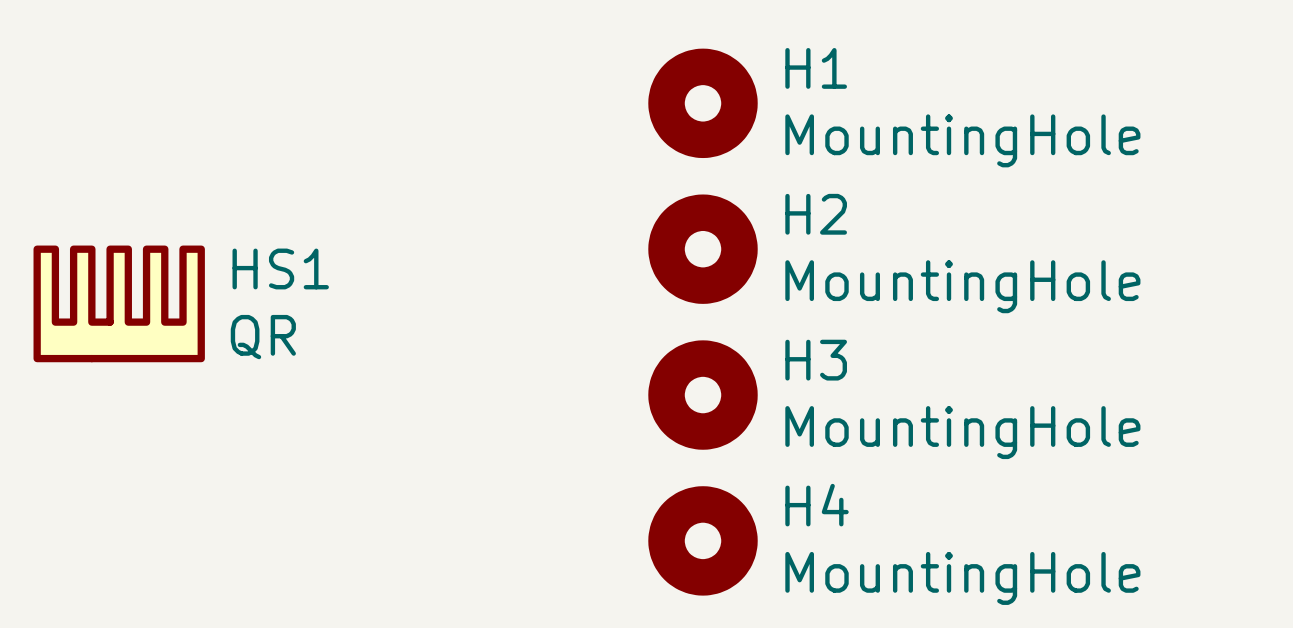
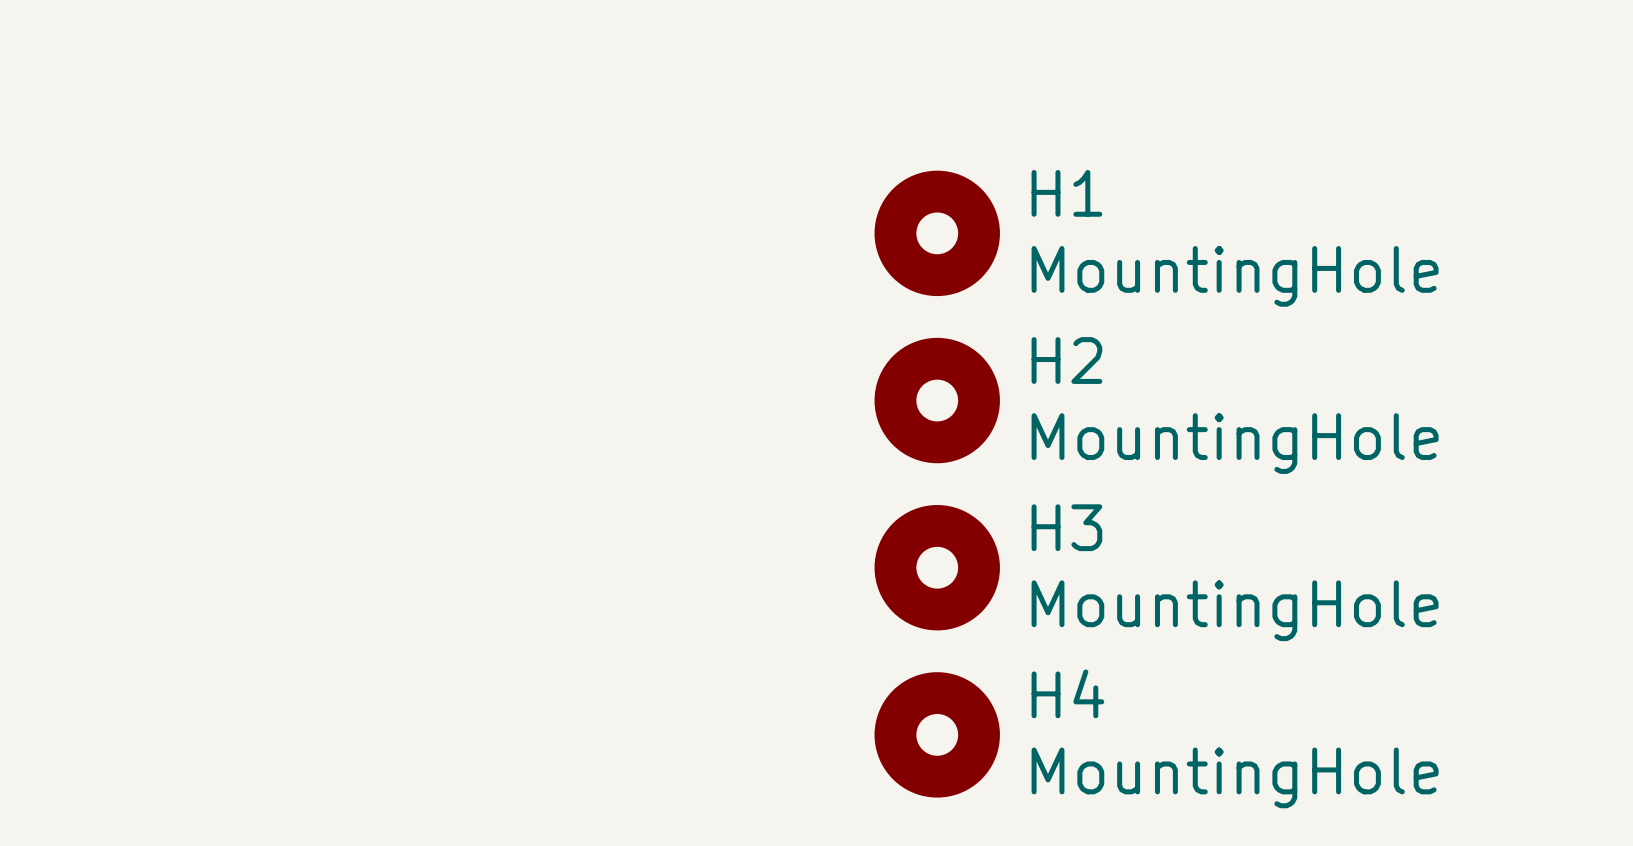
HS1: QR (119, 303) -> none

